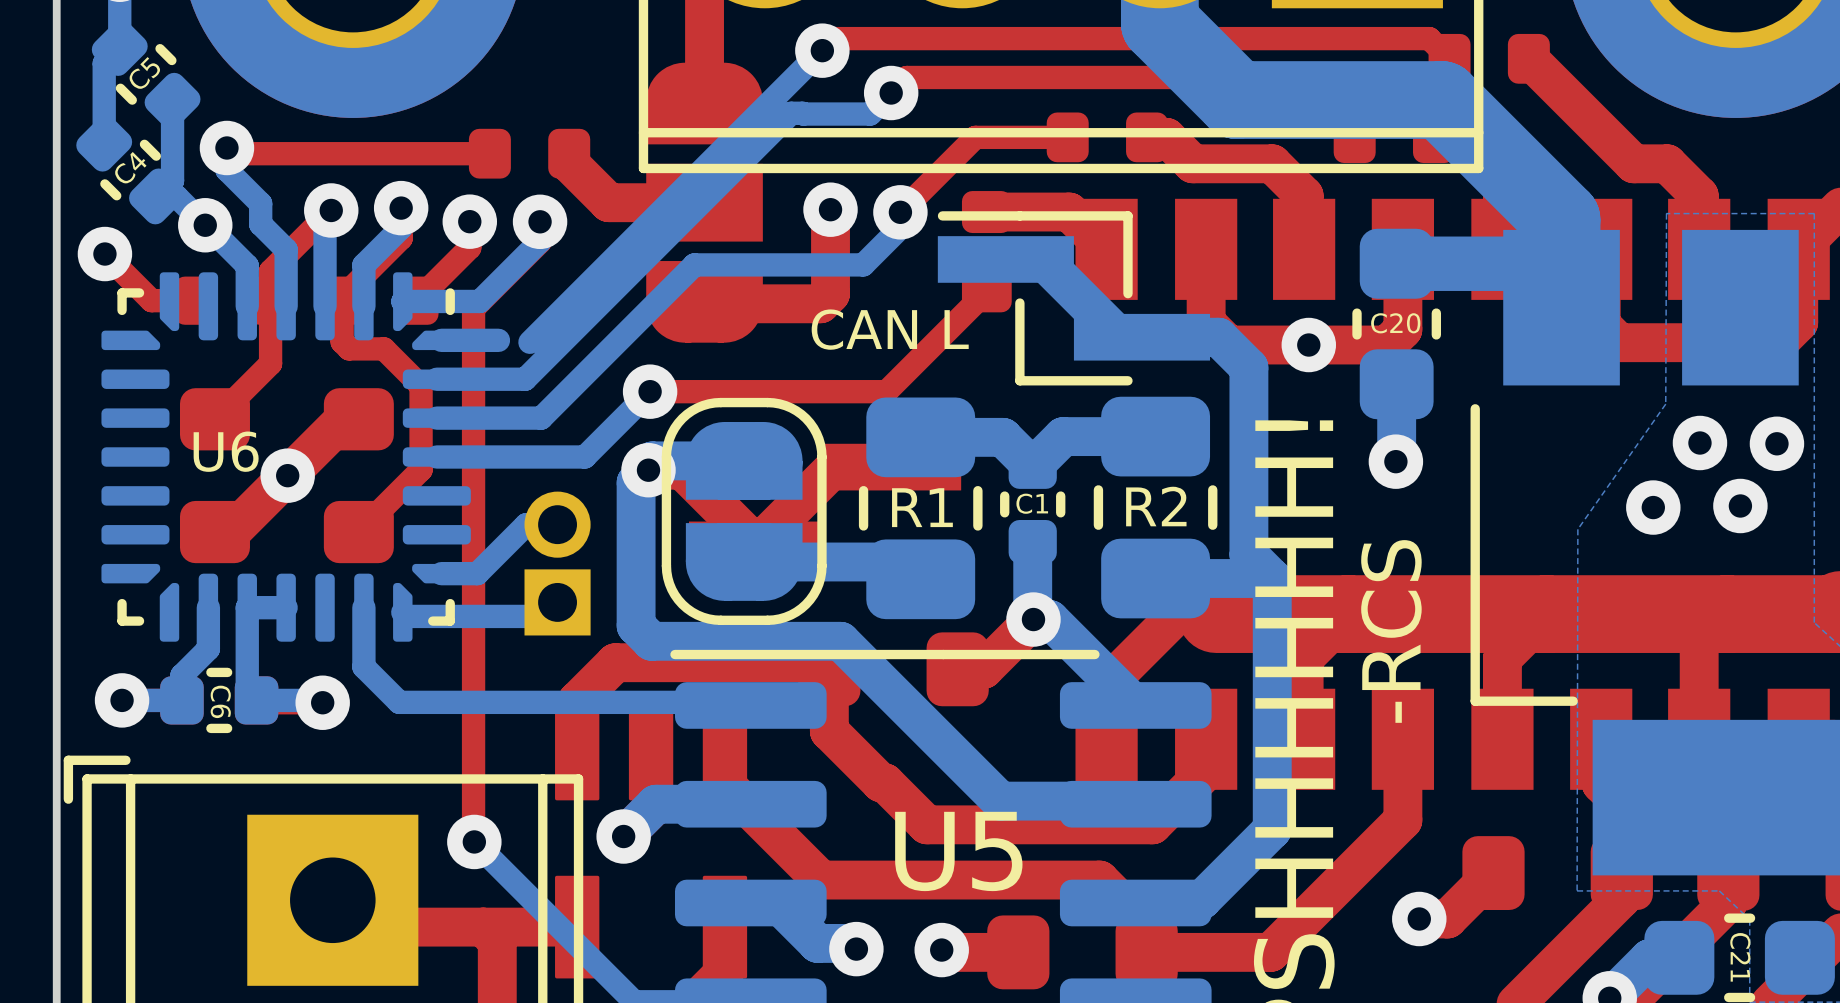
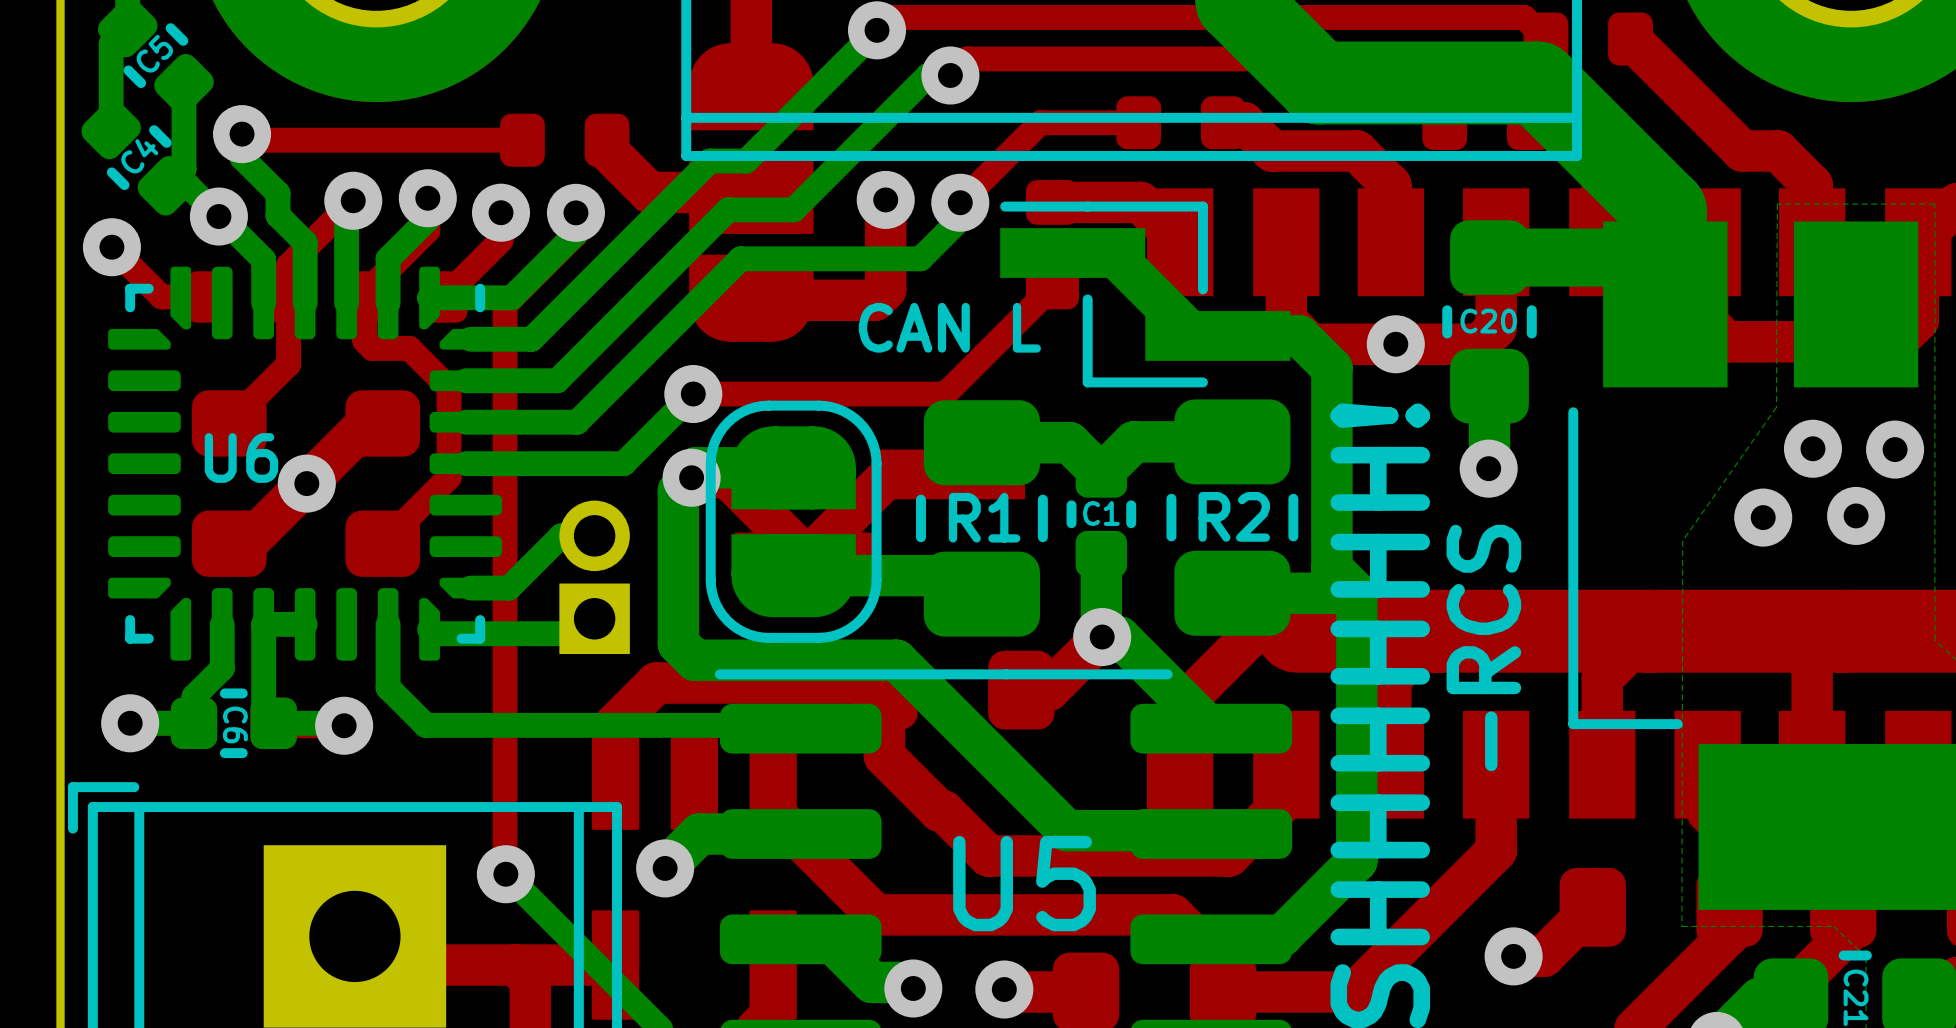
bottom track: (821, 50) (529, 342) -> (877, 30) (746, 161) (709, 161) (531, 339)
bottom track: (891, 93) (870, 114) (803, 114) -> none
bottom track: (802, 113) (791, 113) (525, 379) (522, 379) -> (950, 75) (928, 75) (793, 209) (728, 209) (557, 380)

